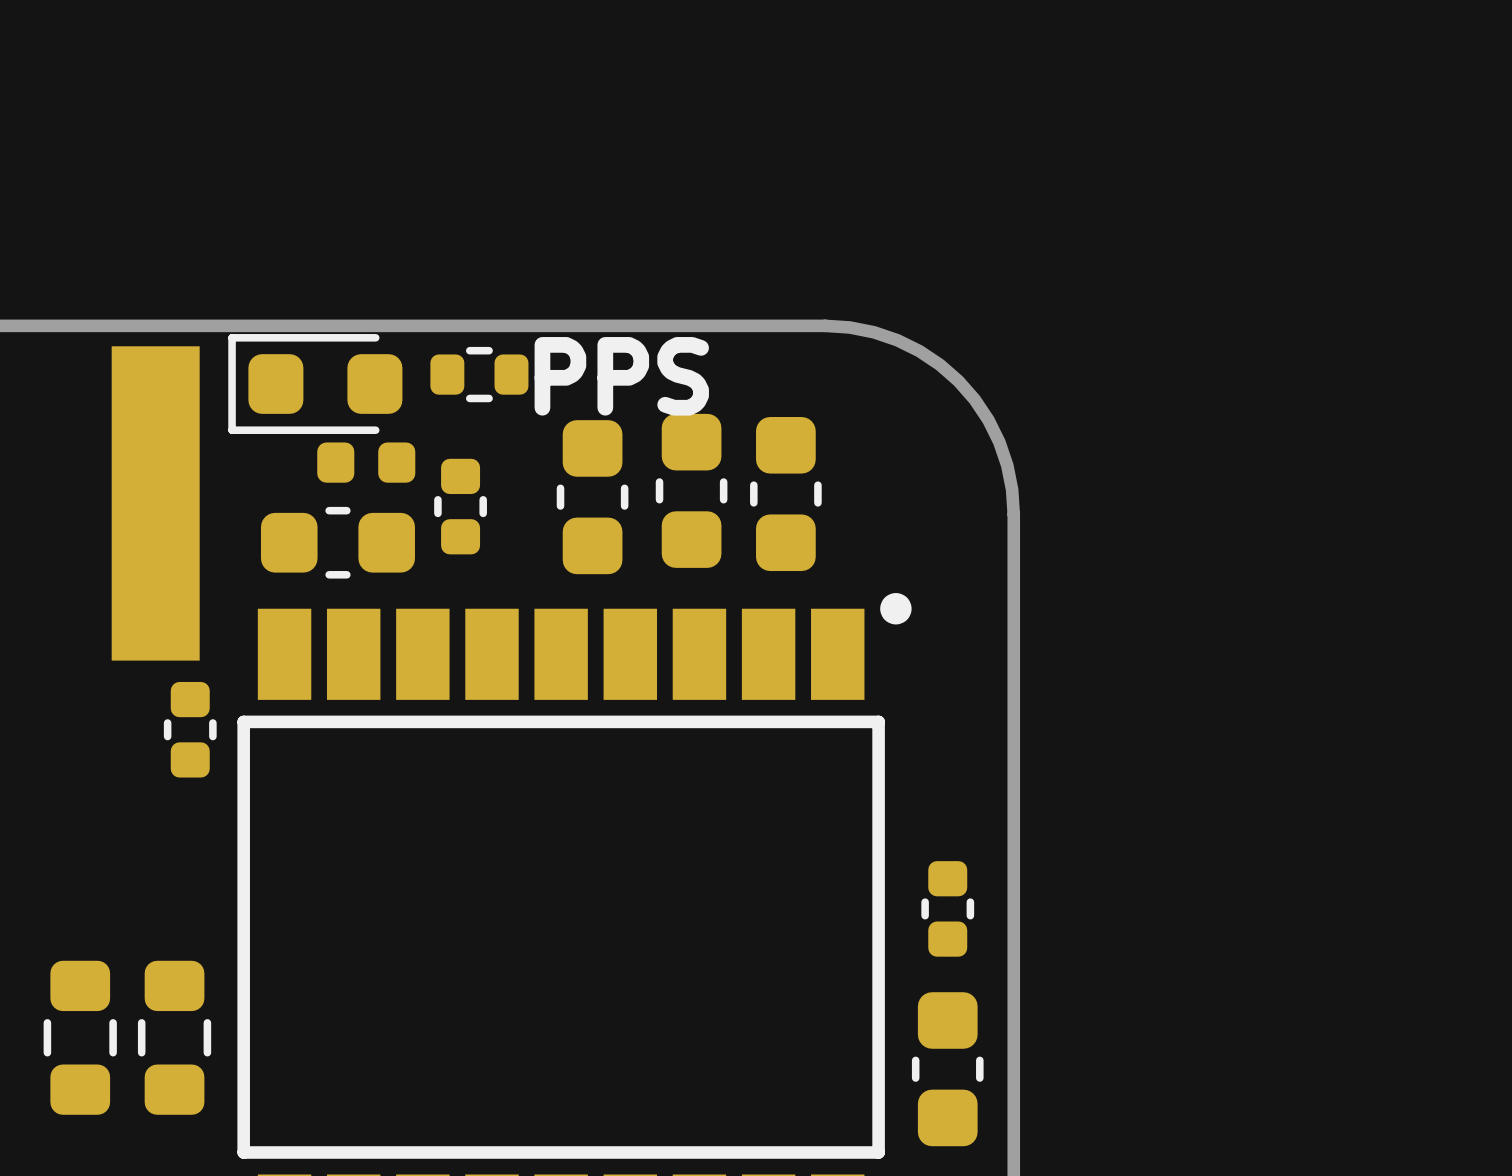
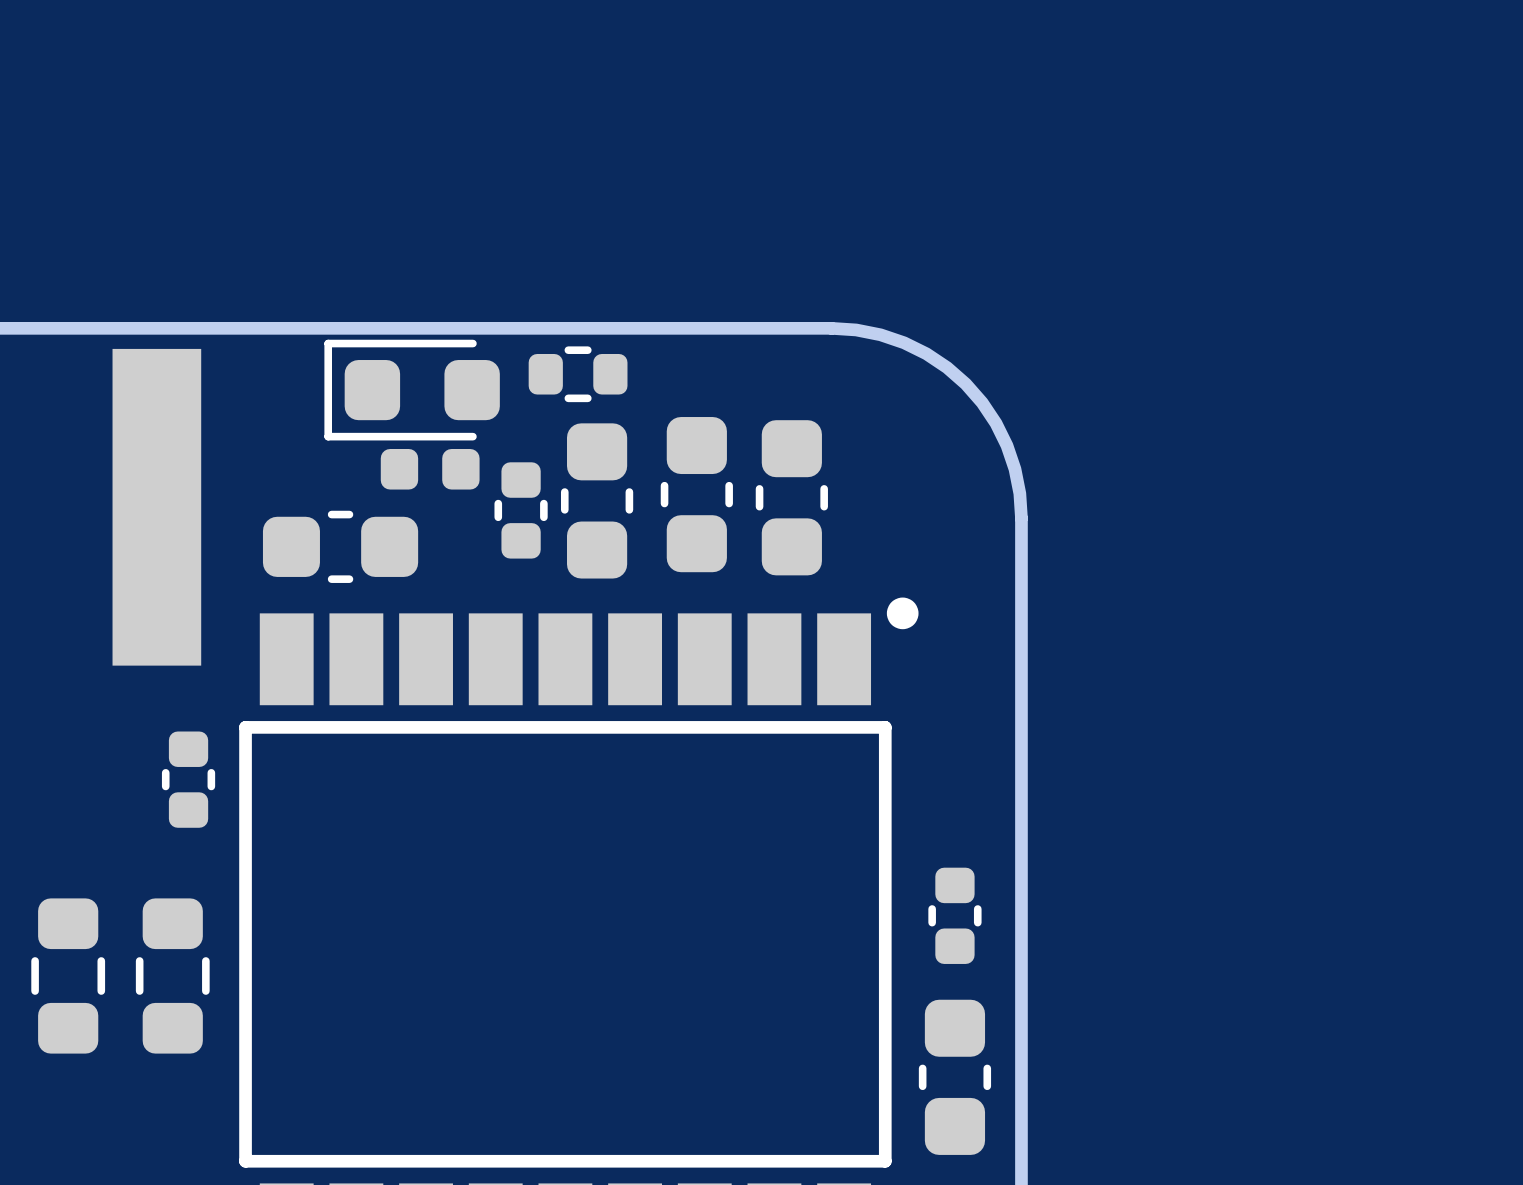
part position: (479, 374) -> (578, 374)
text: PPS (621, 376) -> none
part position: (315, 384) -> (412, 390)
part position: (366, 462) -> (430, 469)
part position: (460, 506) -> (521, 510)
part position: (190, 729) -> (188, 779)
part: none -> (68, 975)
part: none -> (172, 975)
part: (80, 1037) -> none
part: (174, 1037) -> none

